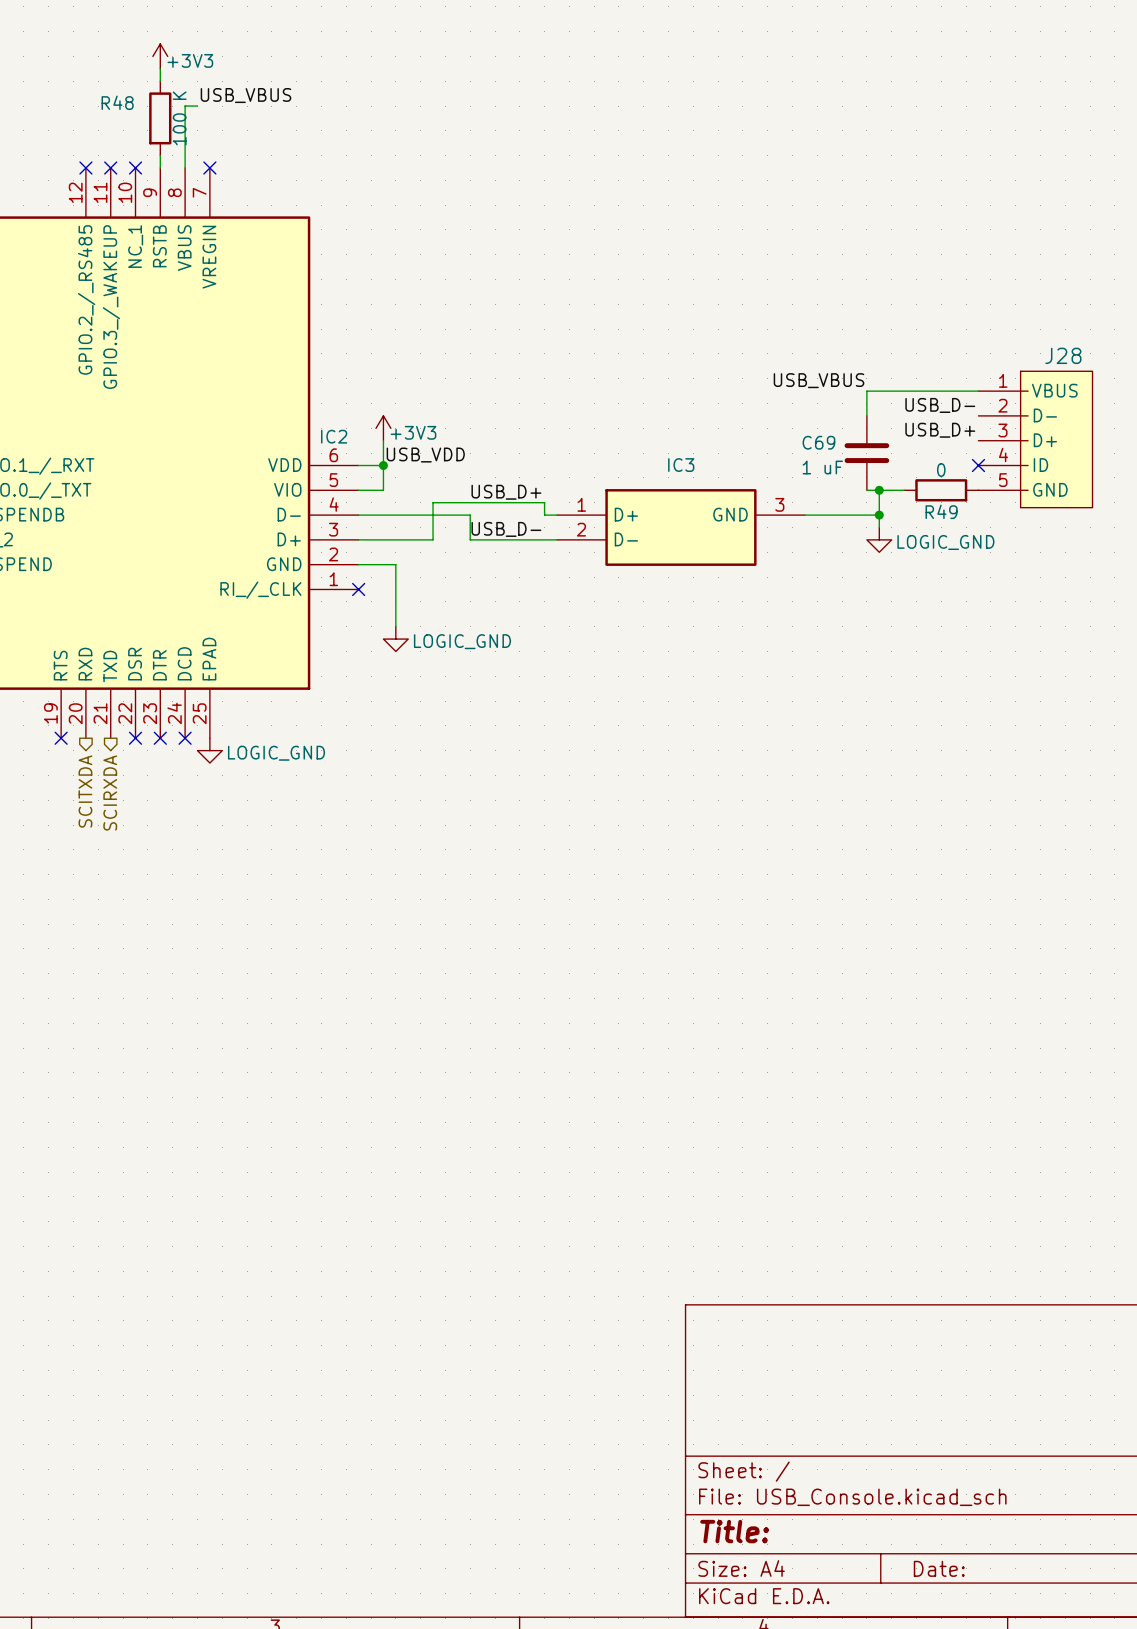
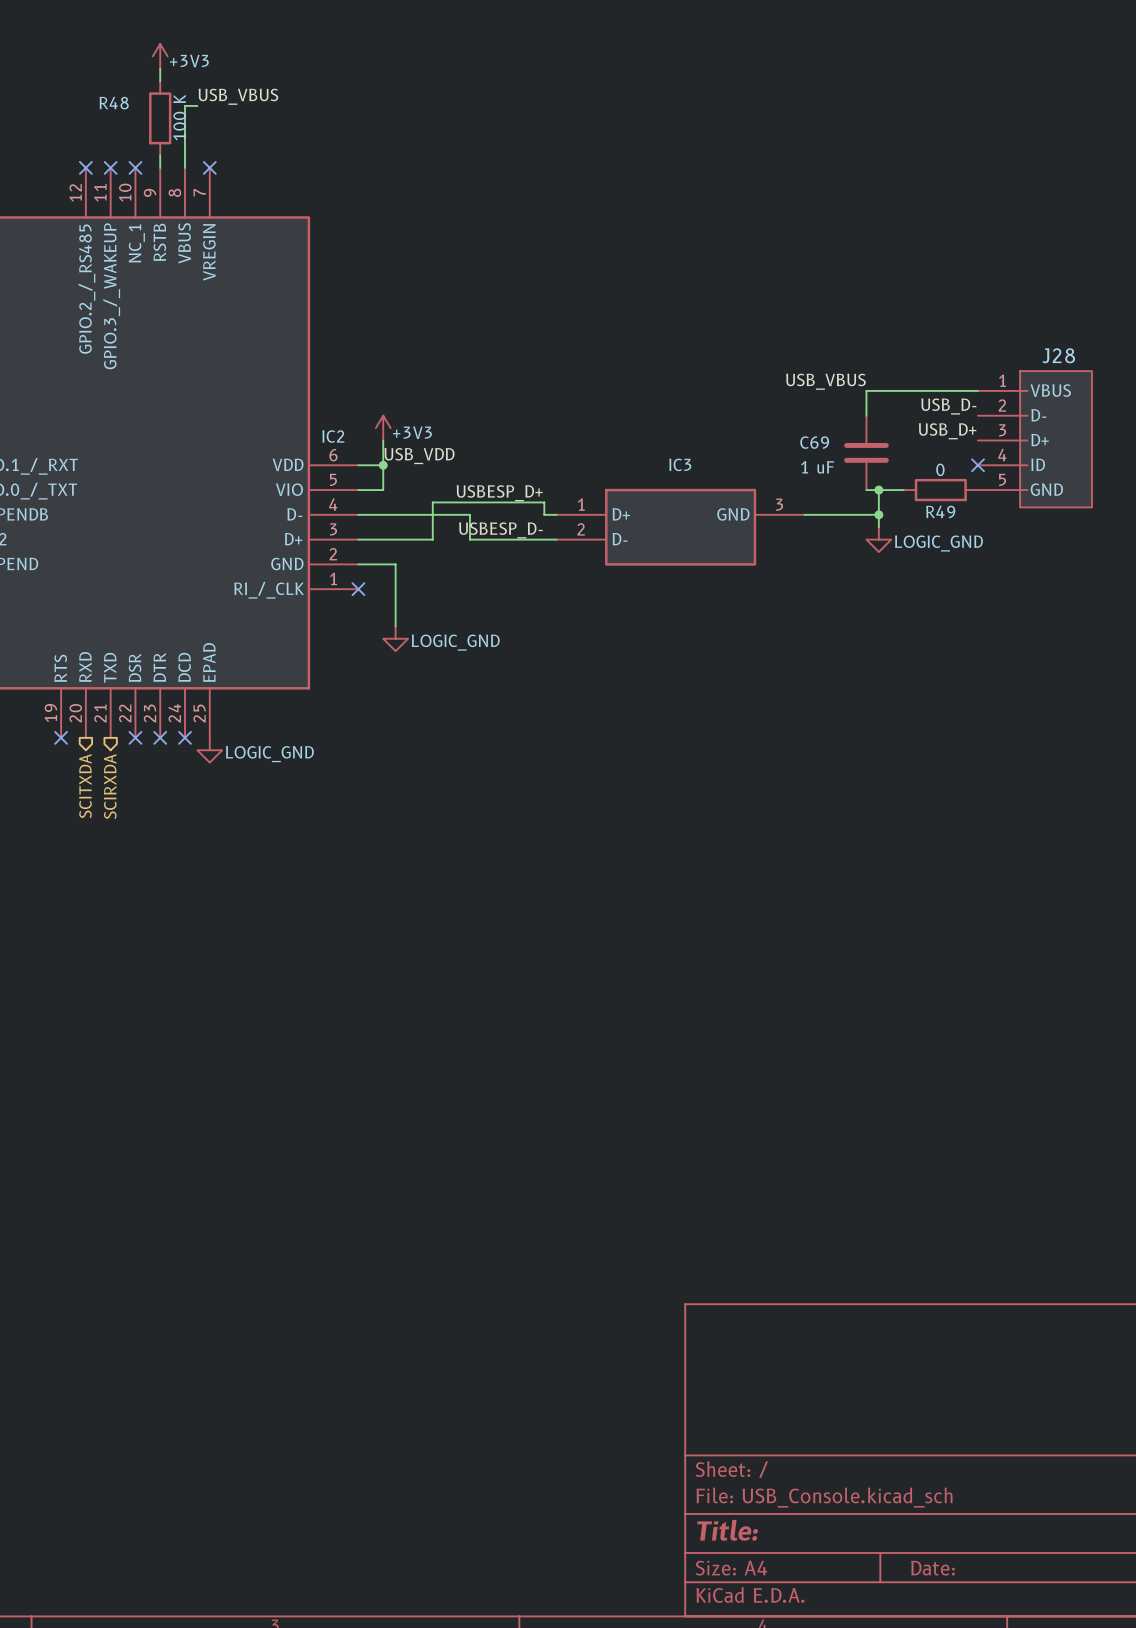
label: USB_D+ (506, 492) -> USBESP_D+ (499, 493)
label: USB_D- (506, 529) -> USBESP_D- (500, 530)

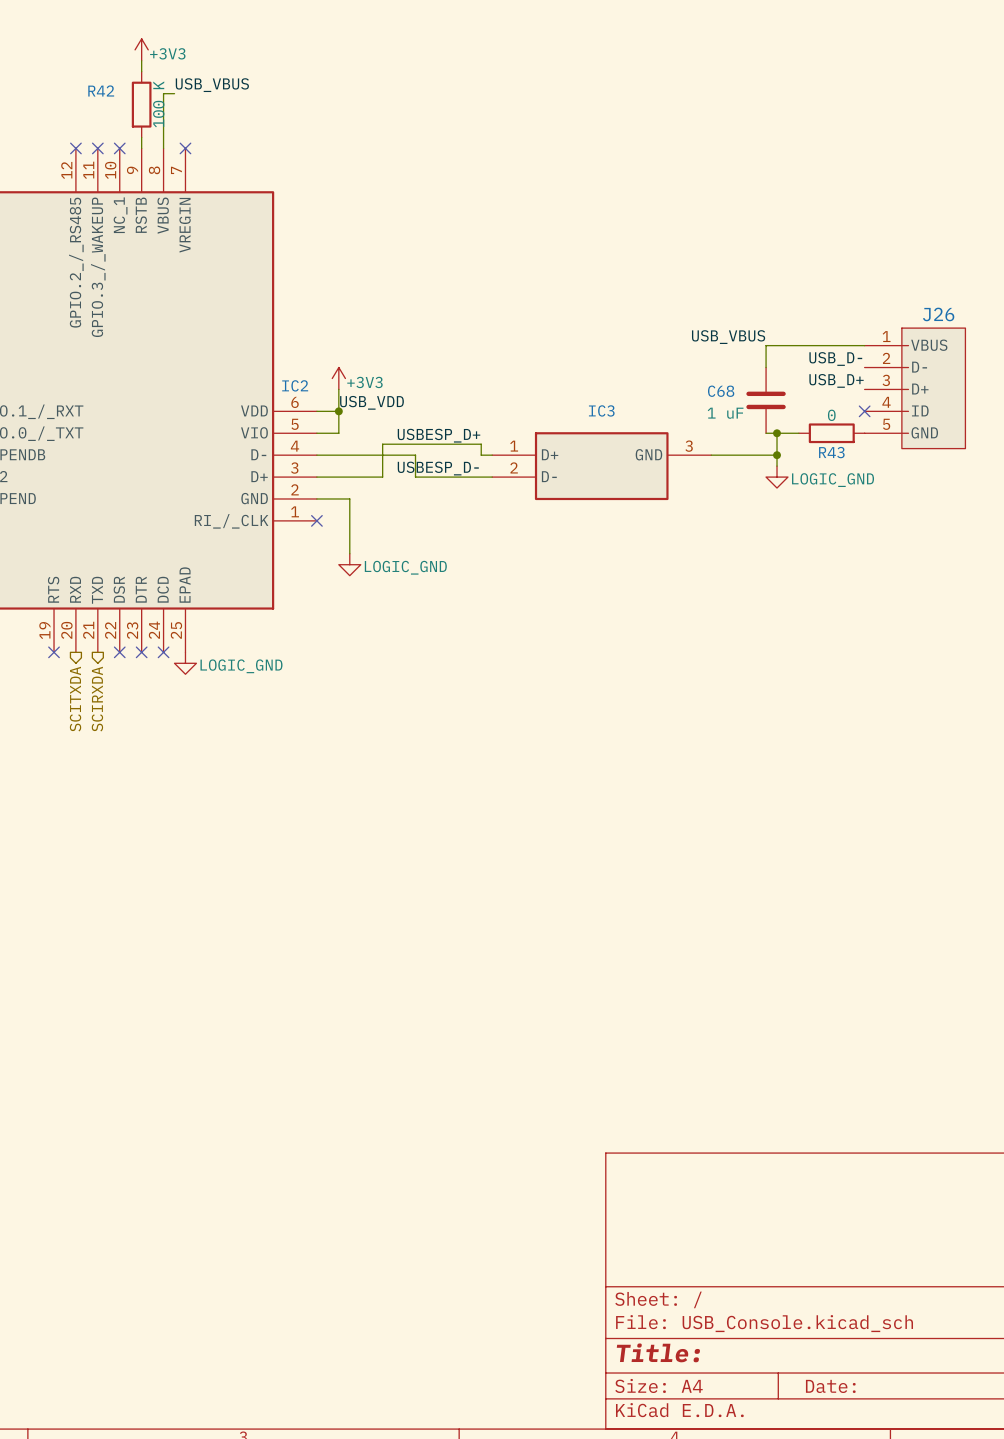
R48 name: R48 (114, 103) -> R42 (101, 90)
J28 name: J28 (1058, 355) -> J26 (938, 314)
C69 name: C69 (814, 442) -> C68 (721, 391)
R49 name: R49 (940, 511) -> R43 (831, 452)

